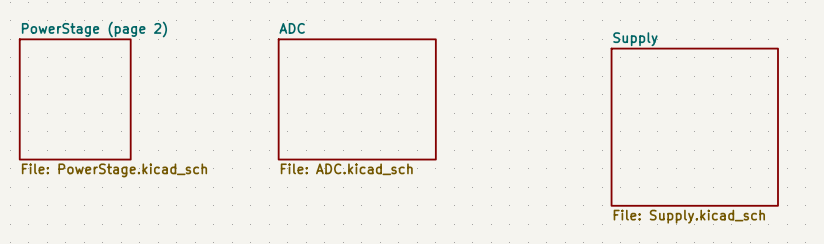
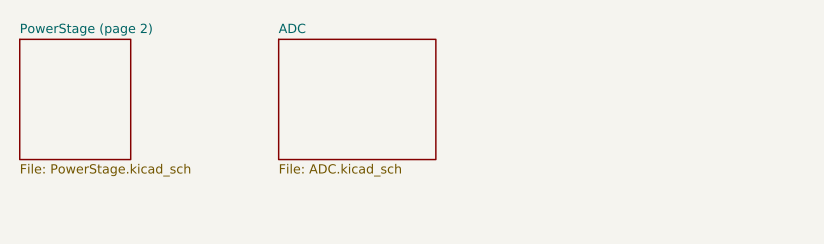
sheet Supply: File: Supply.kicad_sch (694, 127) -> none

